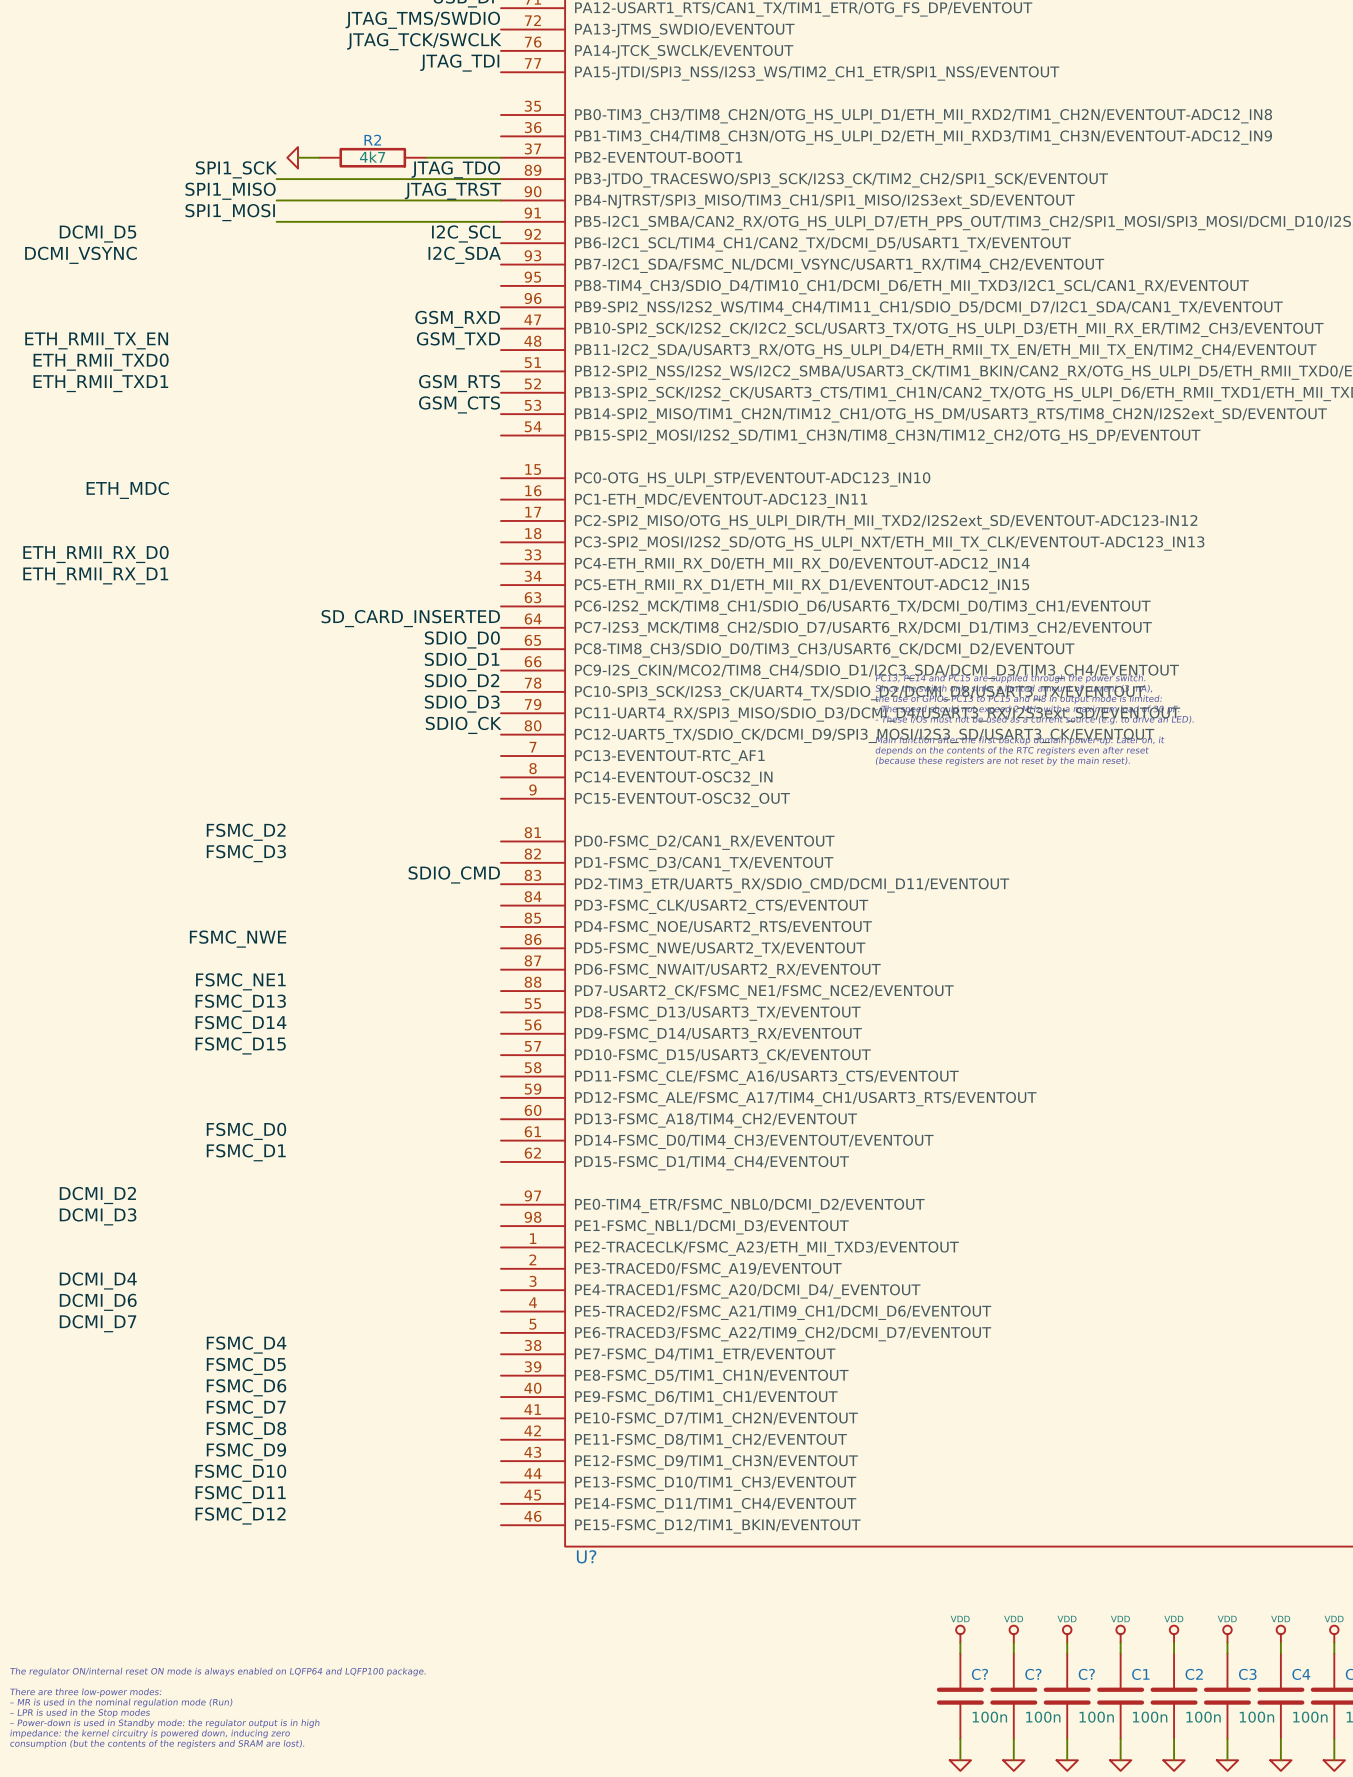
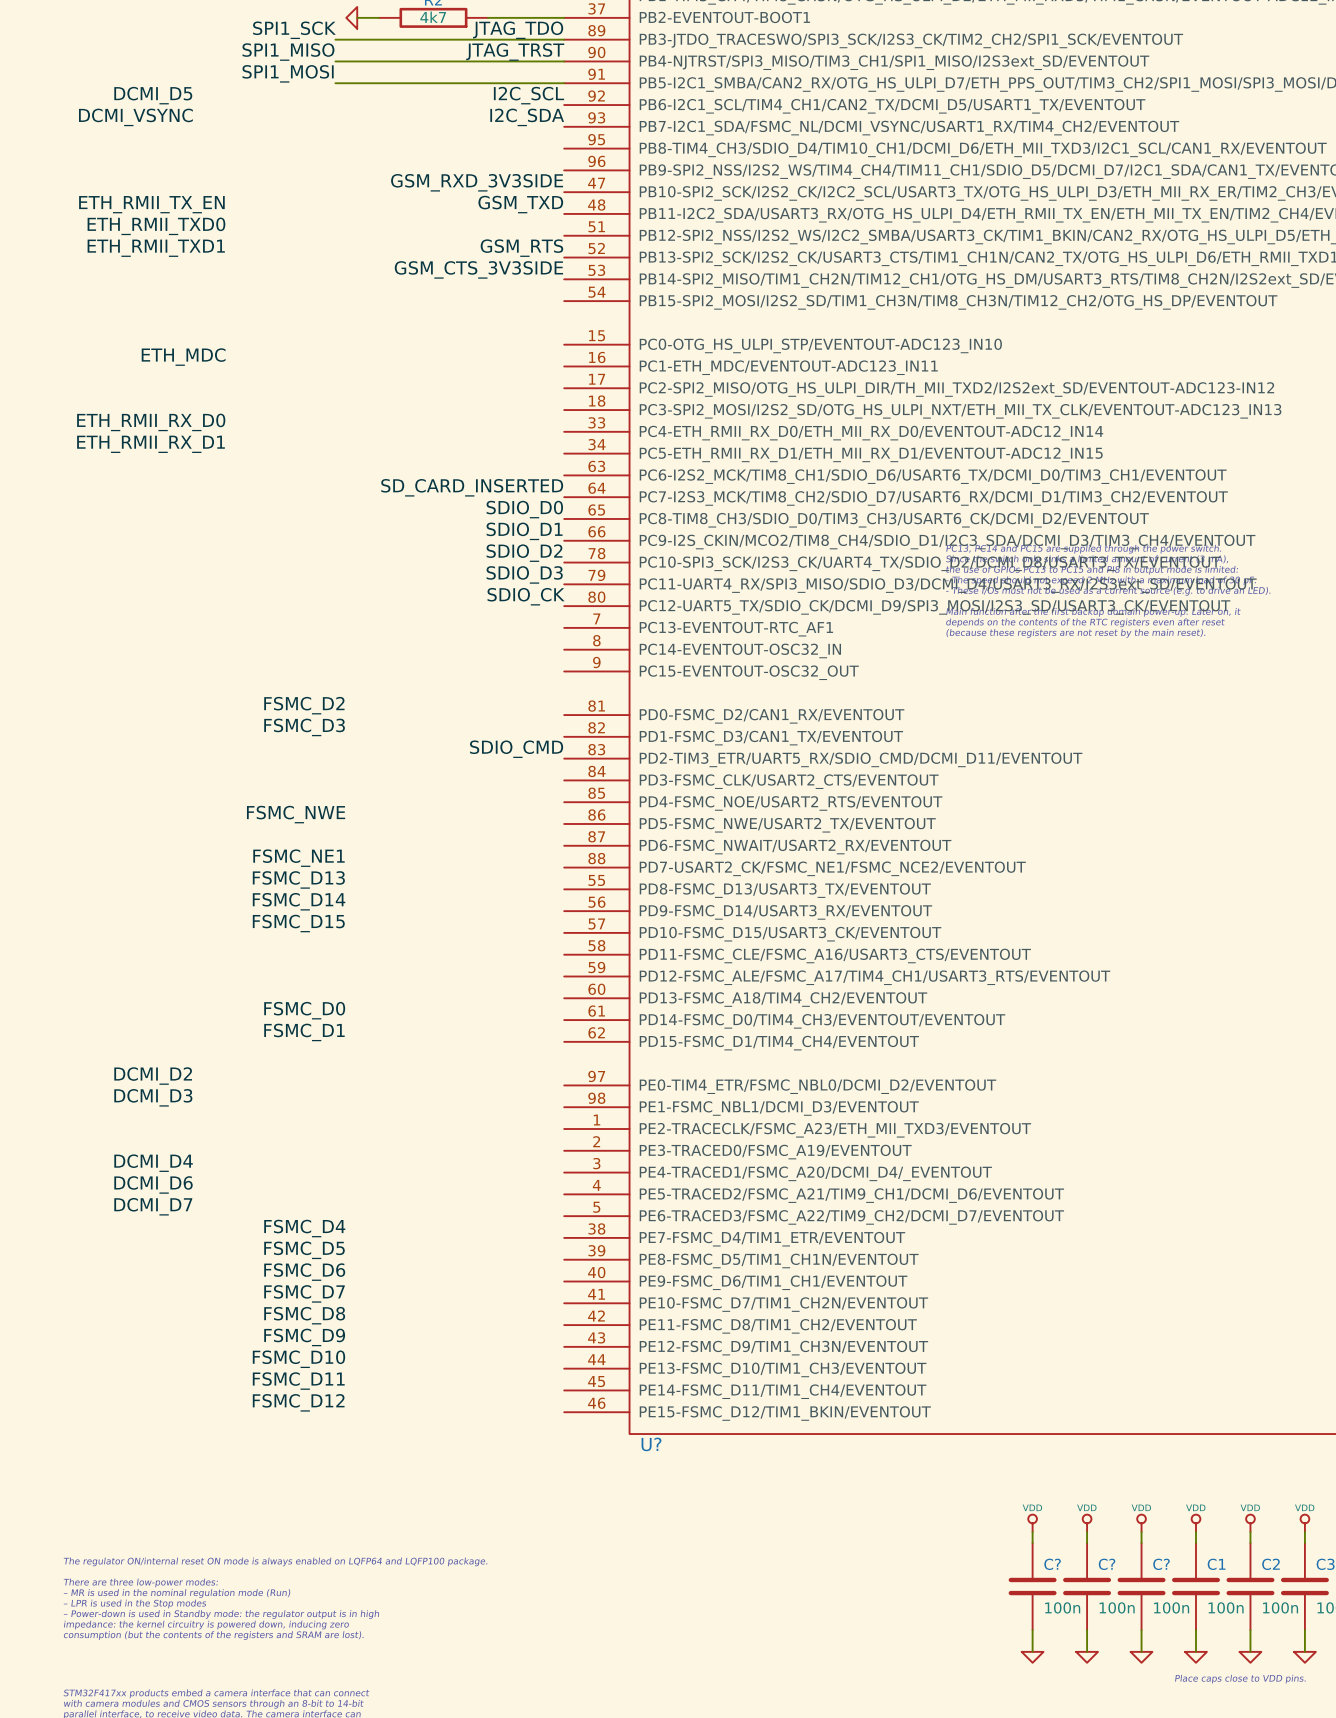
label: GSM_RXD (457, 319) -> GSM_RXD_3V3SIDE (477, 182)
label: GSM_CTS (459, 404) -> GSM_CTS_3V3SIDE (478, 269)

